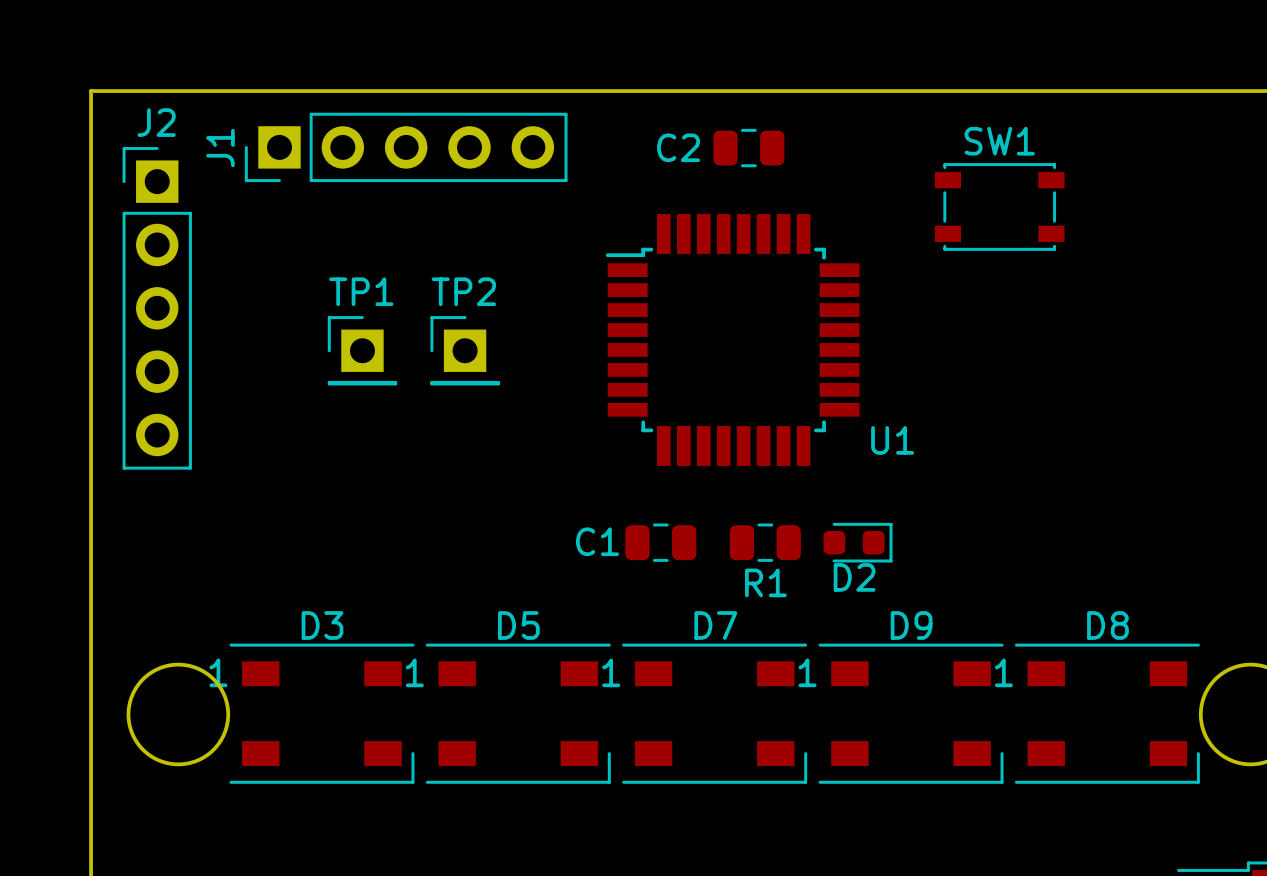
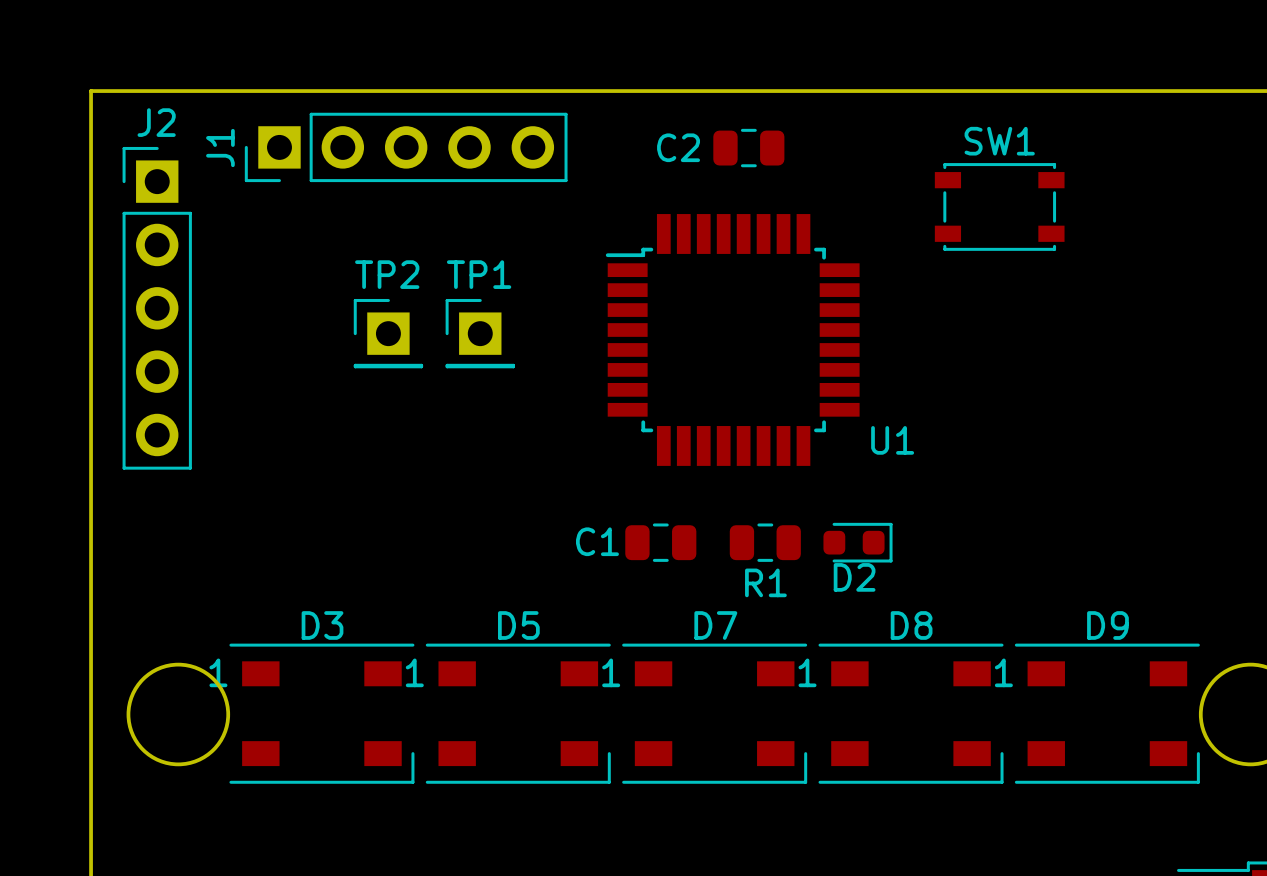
TP1 position: (362, 350) -> (480, 333)
TP2 position: (465, 350) -> (388, 333)
D9 name: D9 (911, 625) -> D8 (911, 625)
D8 name: D8 (1107, 625) -> D9 (1107, 625)

